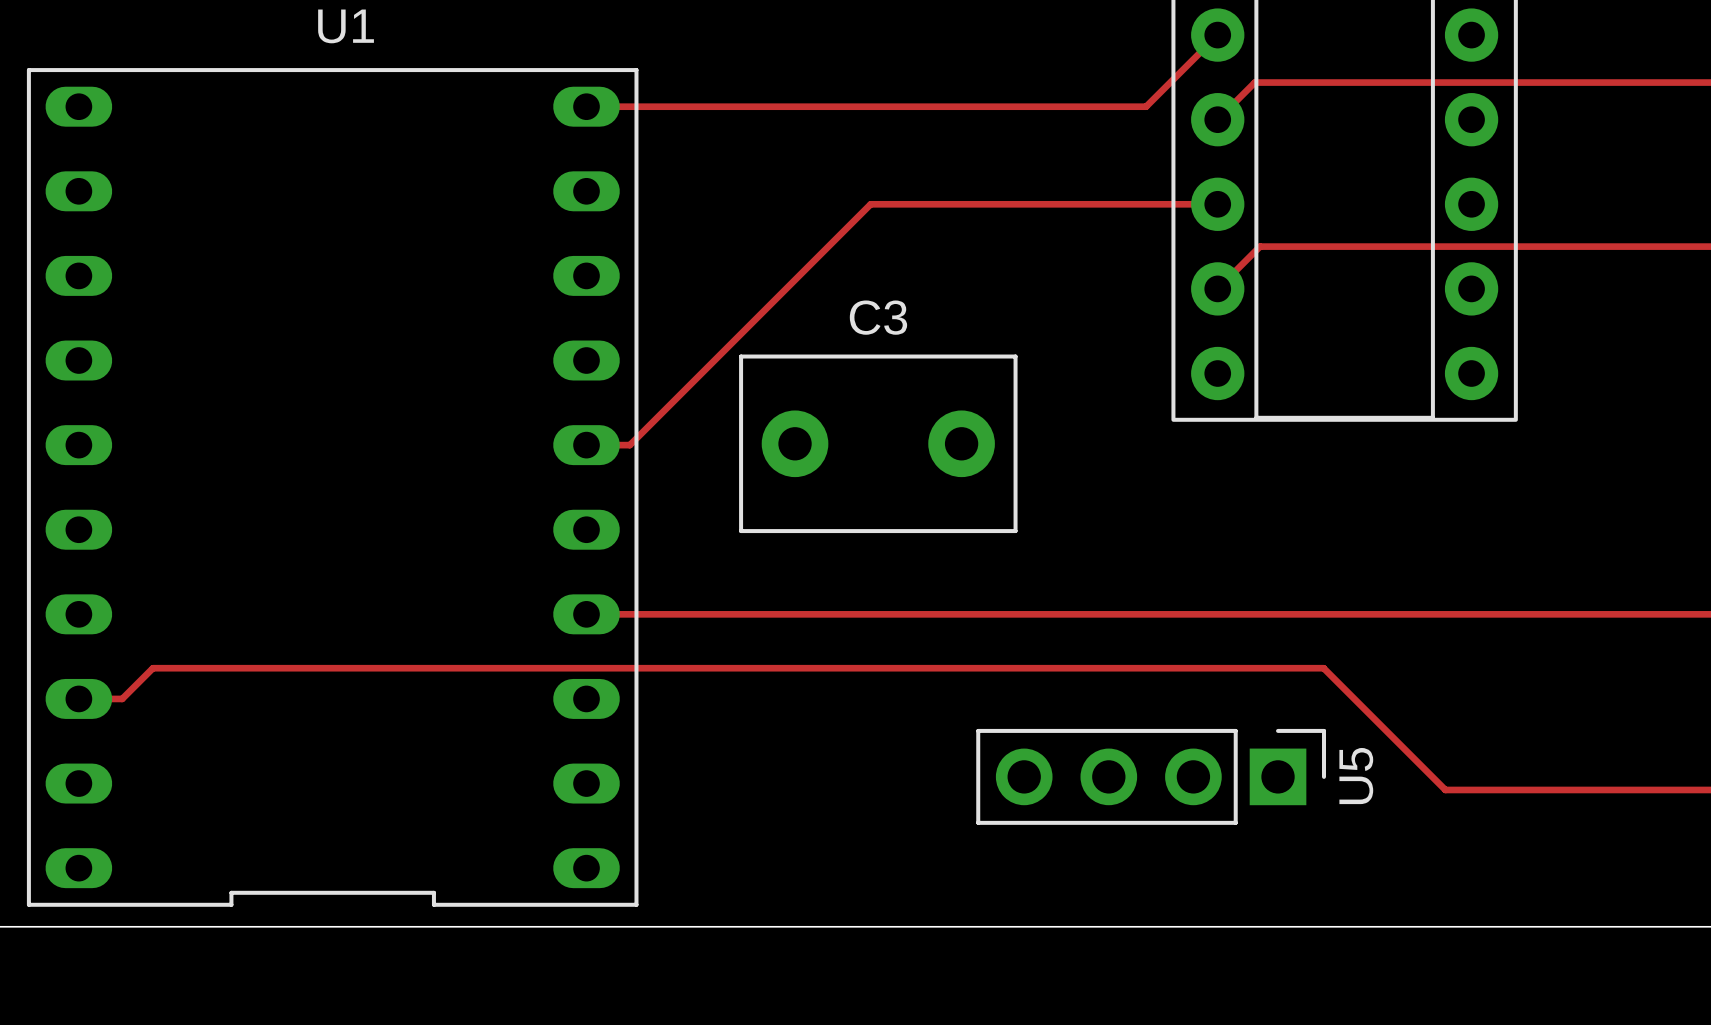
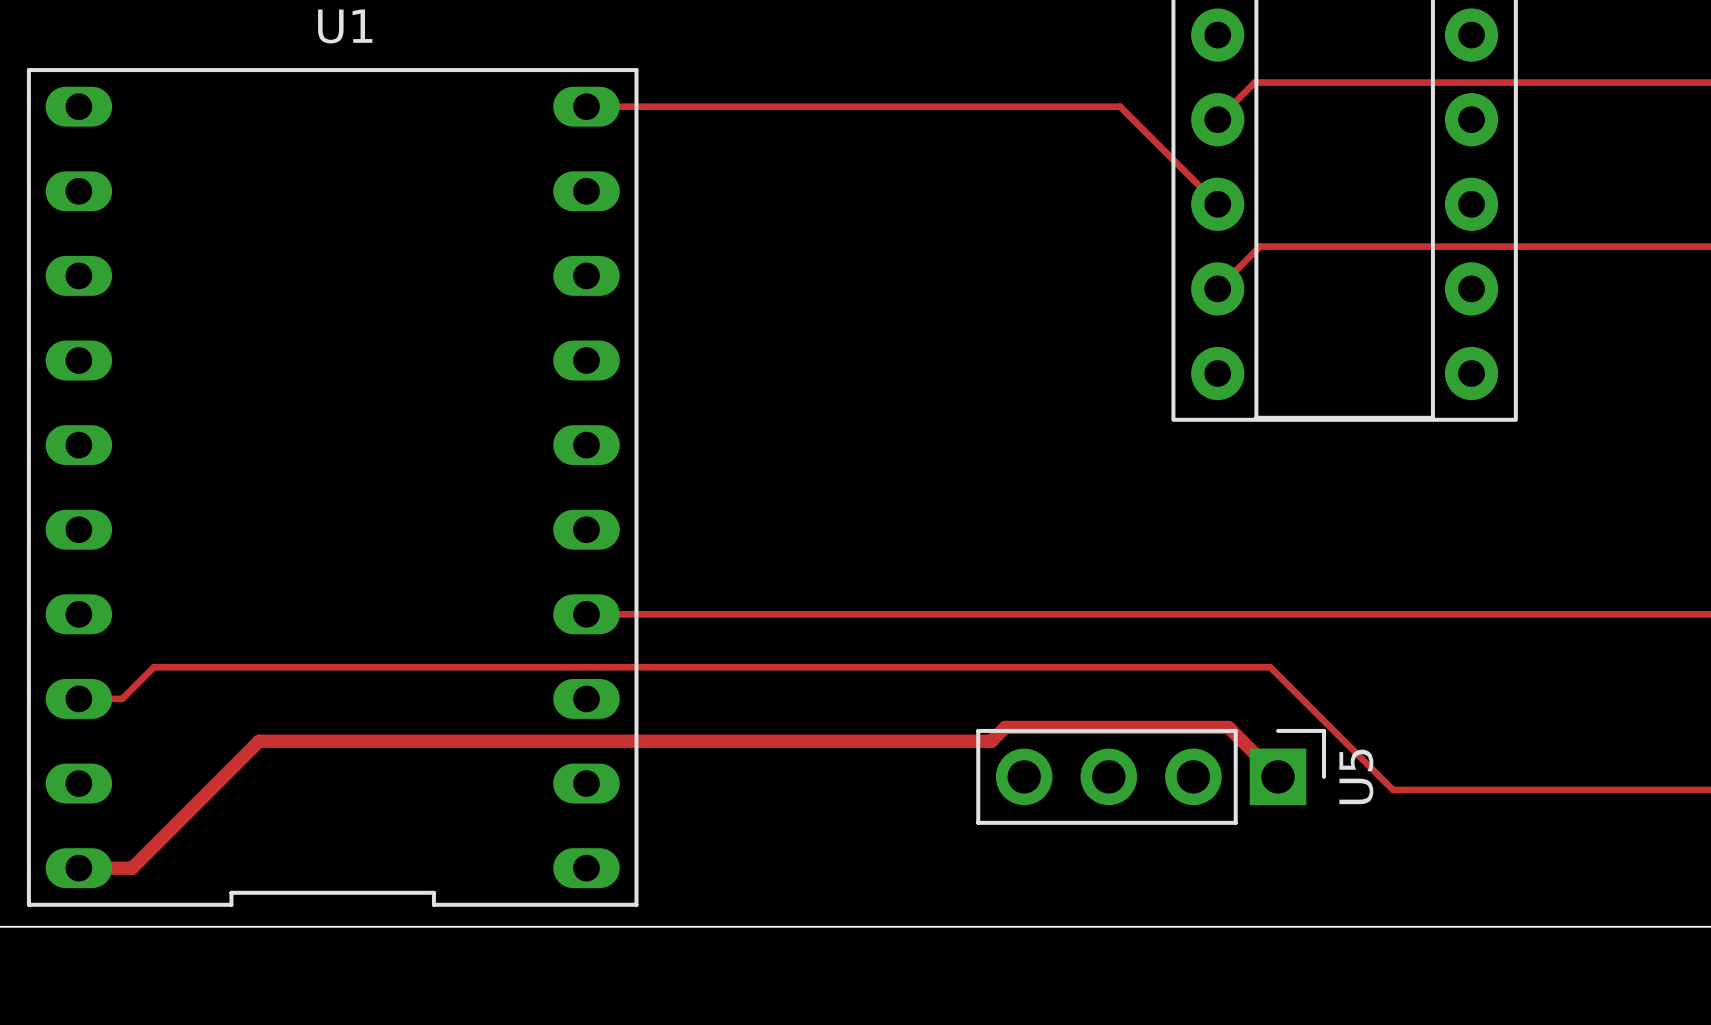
track: (1217, 35) (1146, 106) (1120, 106) -> (1217, 204) (1120, 106)
track: (1217, 204) (870, 204) (629, 445) (586, 445) -> none
C3: (878, 443) -> none
track: (152, 668) (1323, 668) (1445, 789) -> (152, 668) (1270, 667) (1393, 789) (1445, 789)
track: none -> (1278, 776) (1228, 727) (1005, 727) (991, 741) (259, 741) (132, 868) (78, 868)

